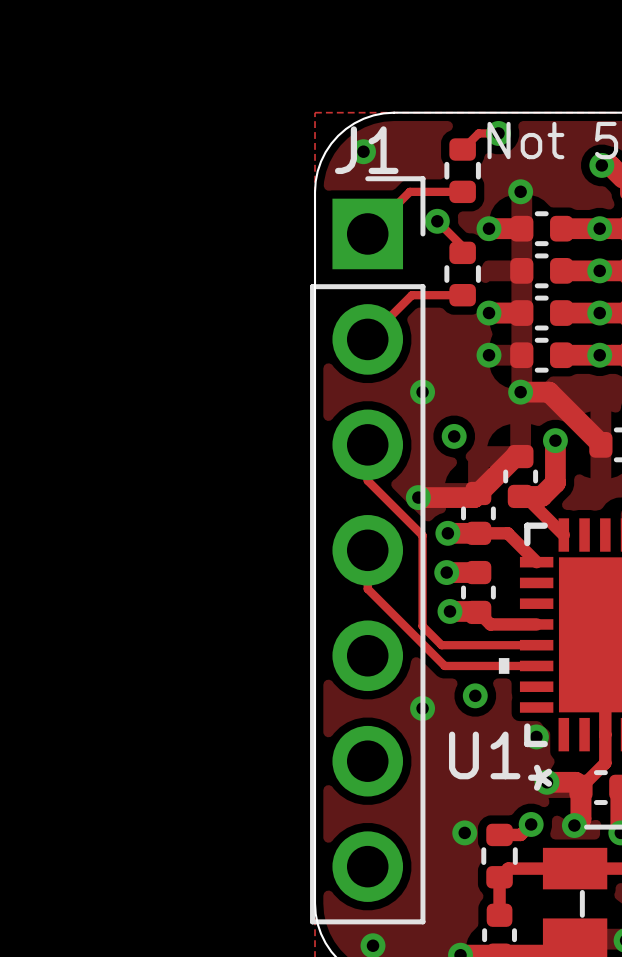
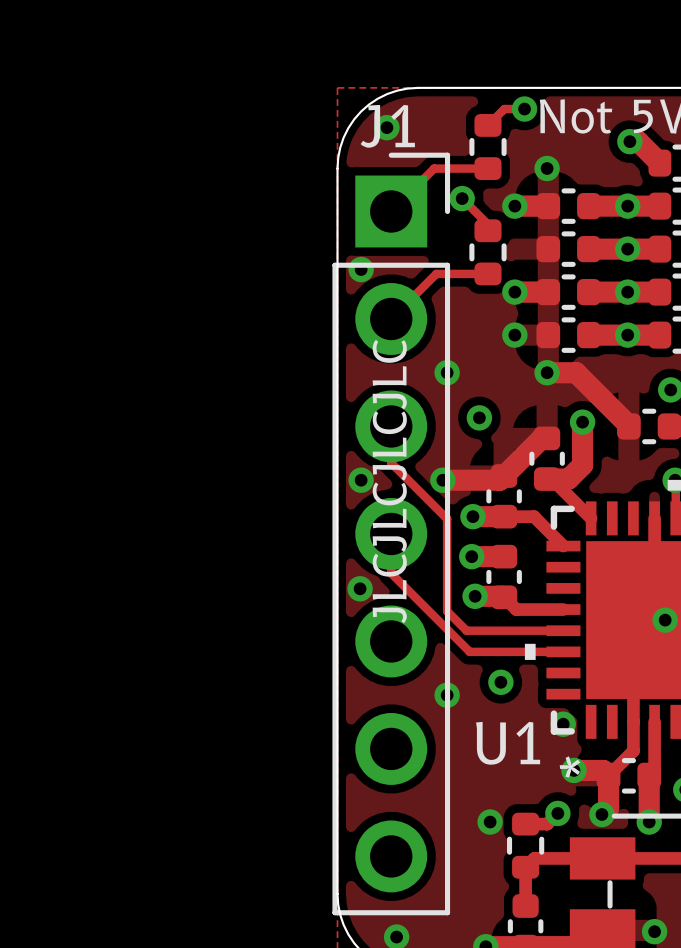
via: none -> (361, 269)
via: none -> (361, 480)
text: none -> JLCJLCJLCJLC (389, 481)
via: none -> (360, 588)

